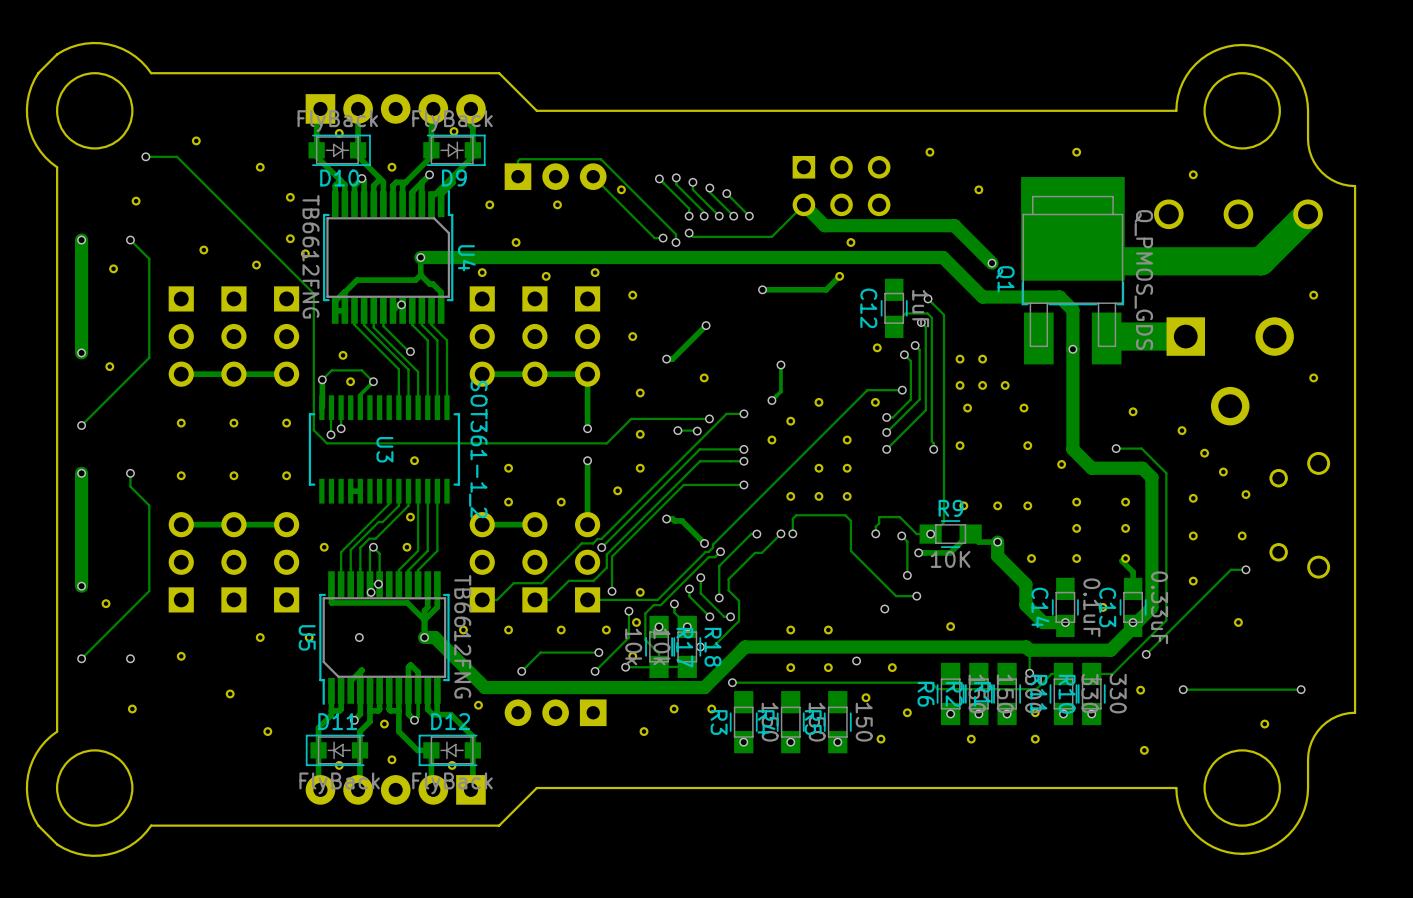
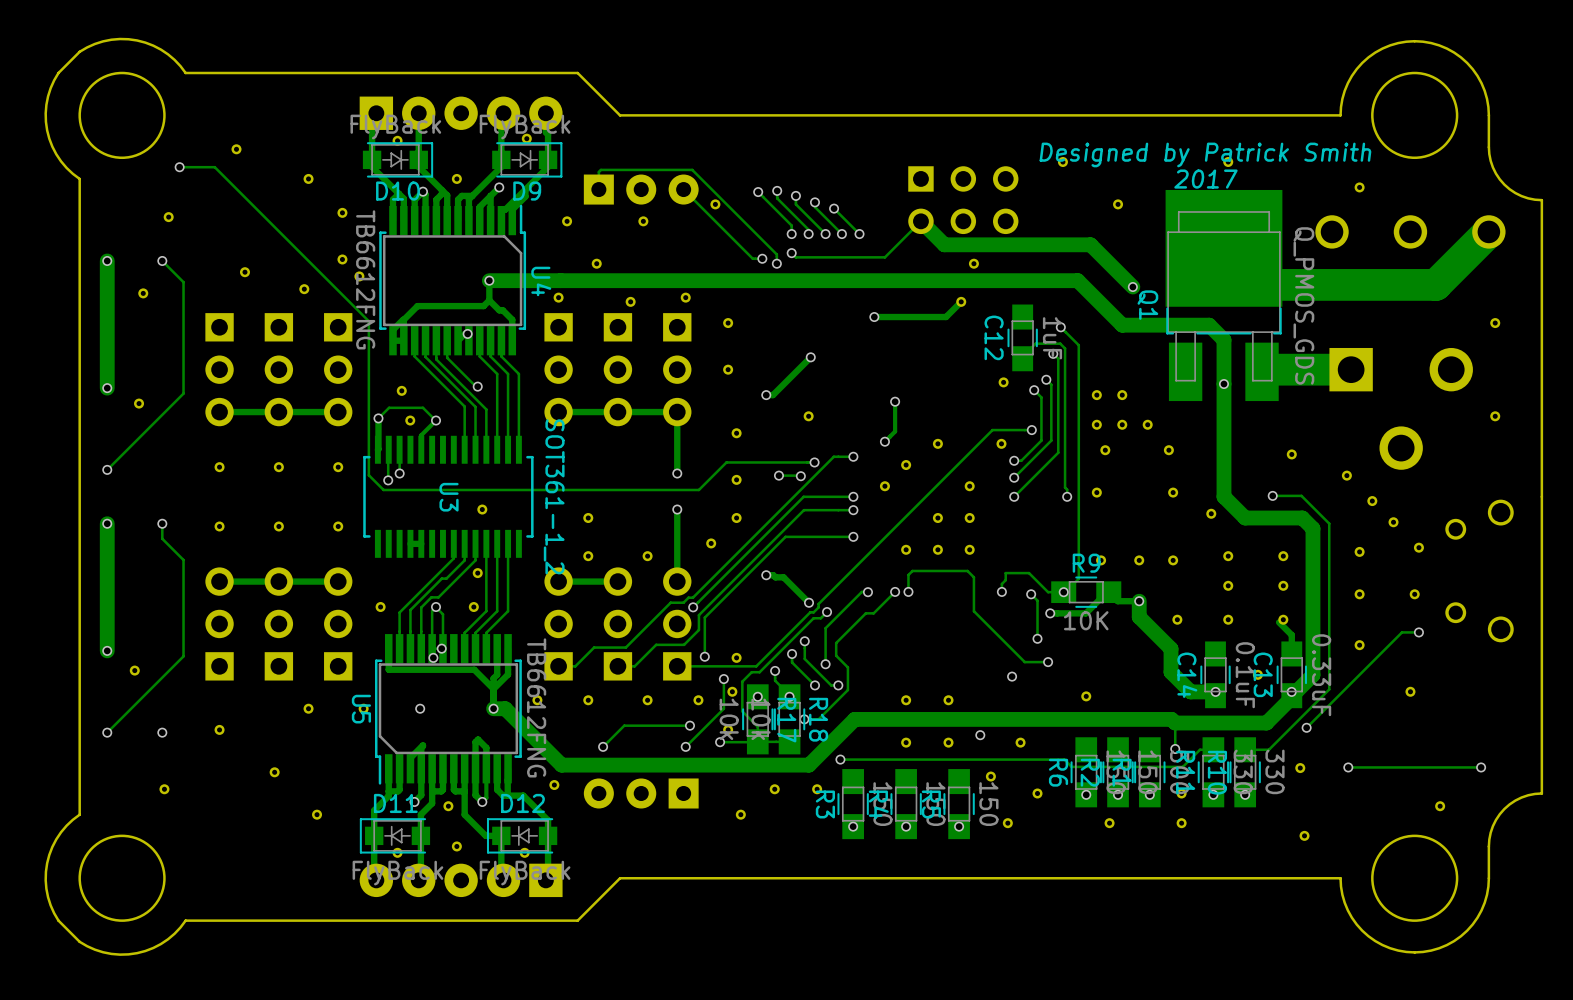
text: none -> Designed by Patrick Smith (1205, 154)
text: none -> 2017 (1205, 179)

